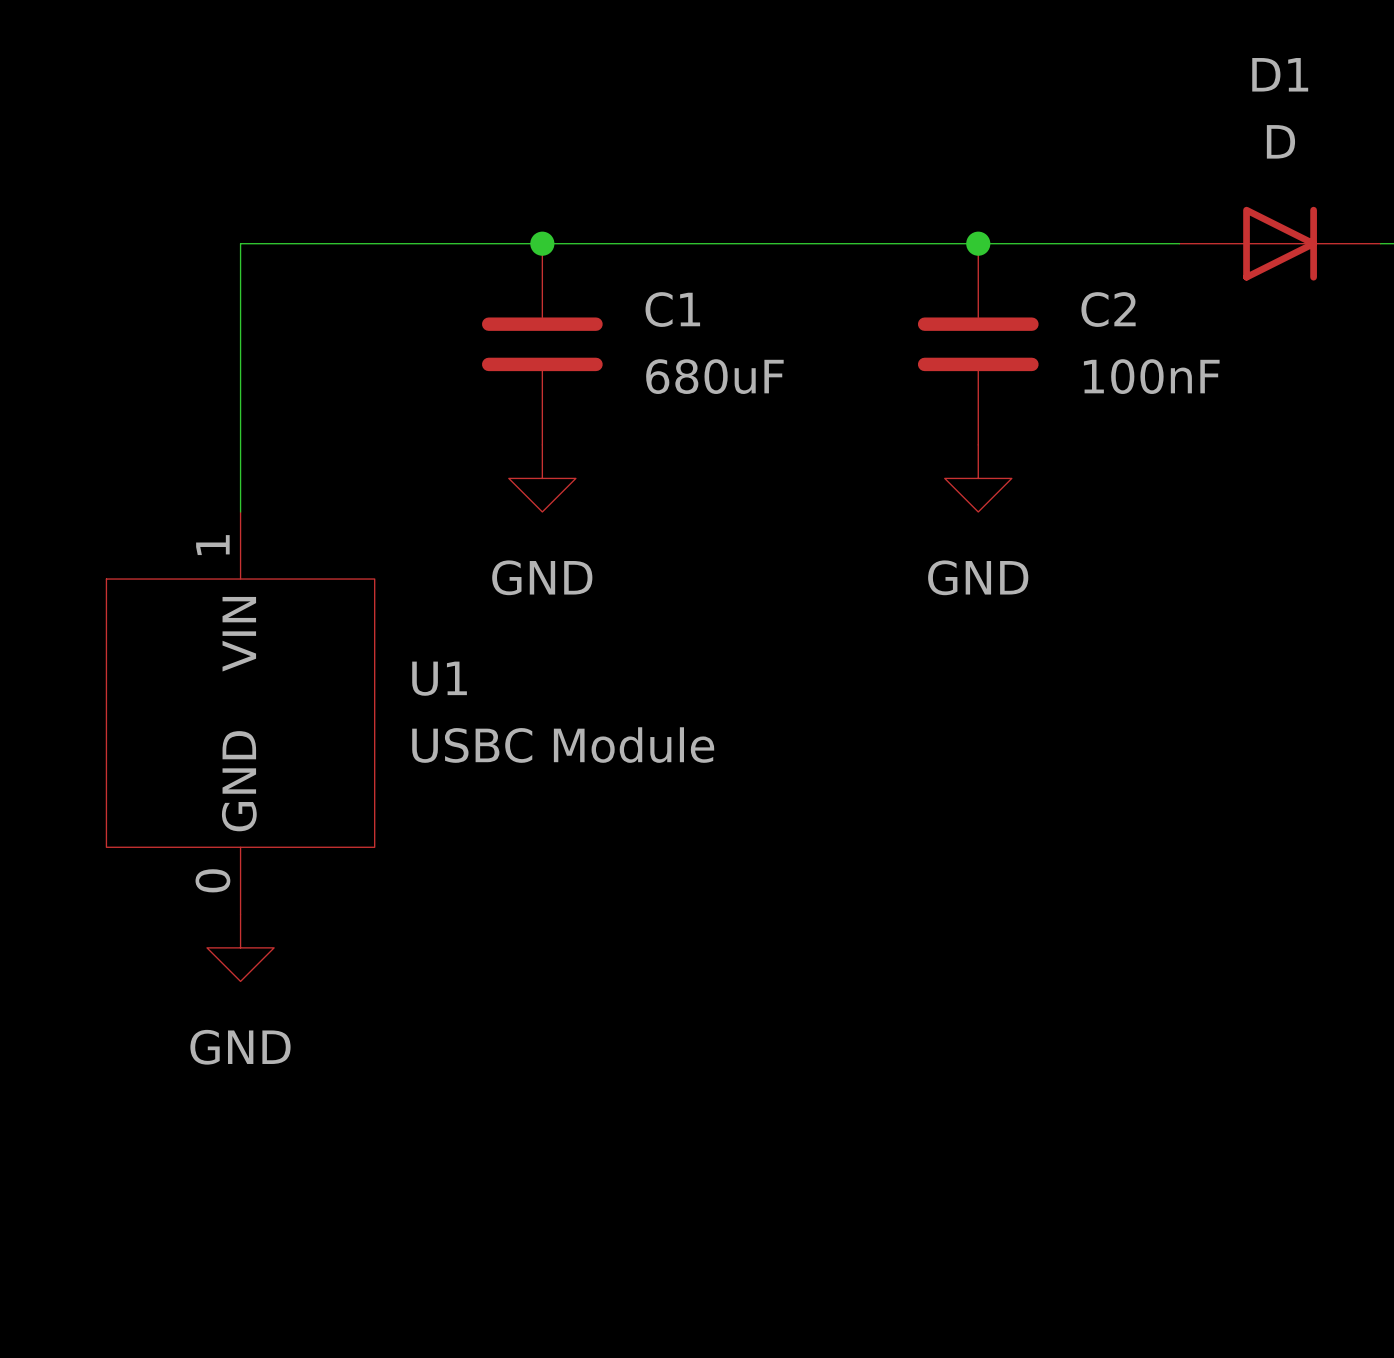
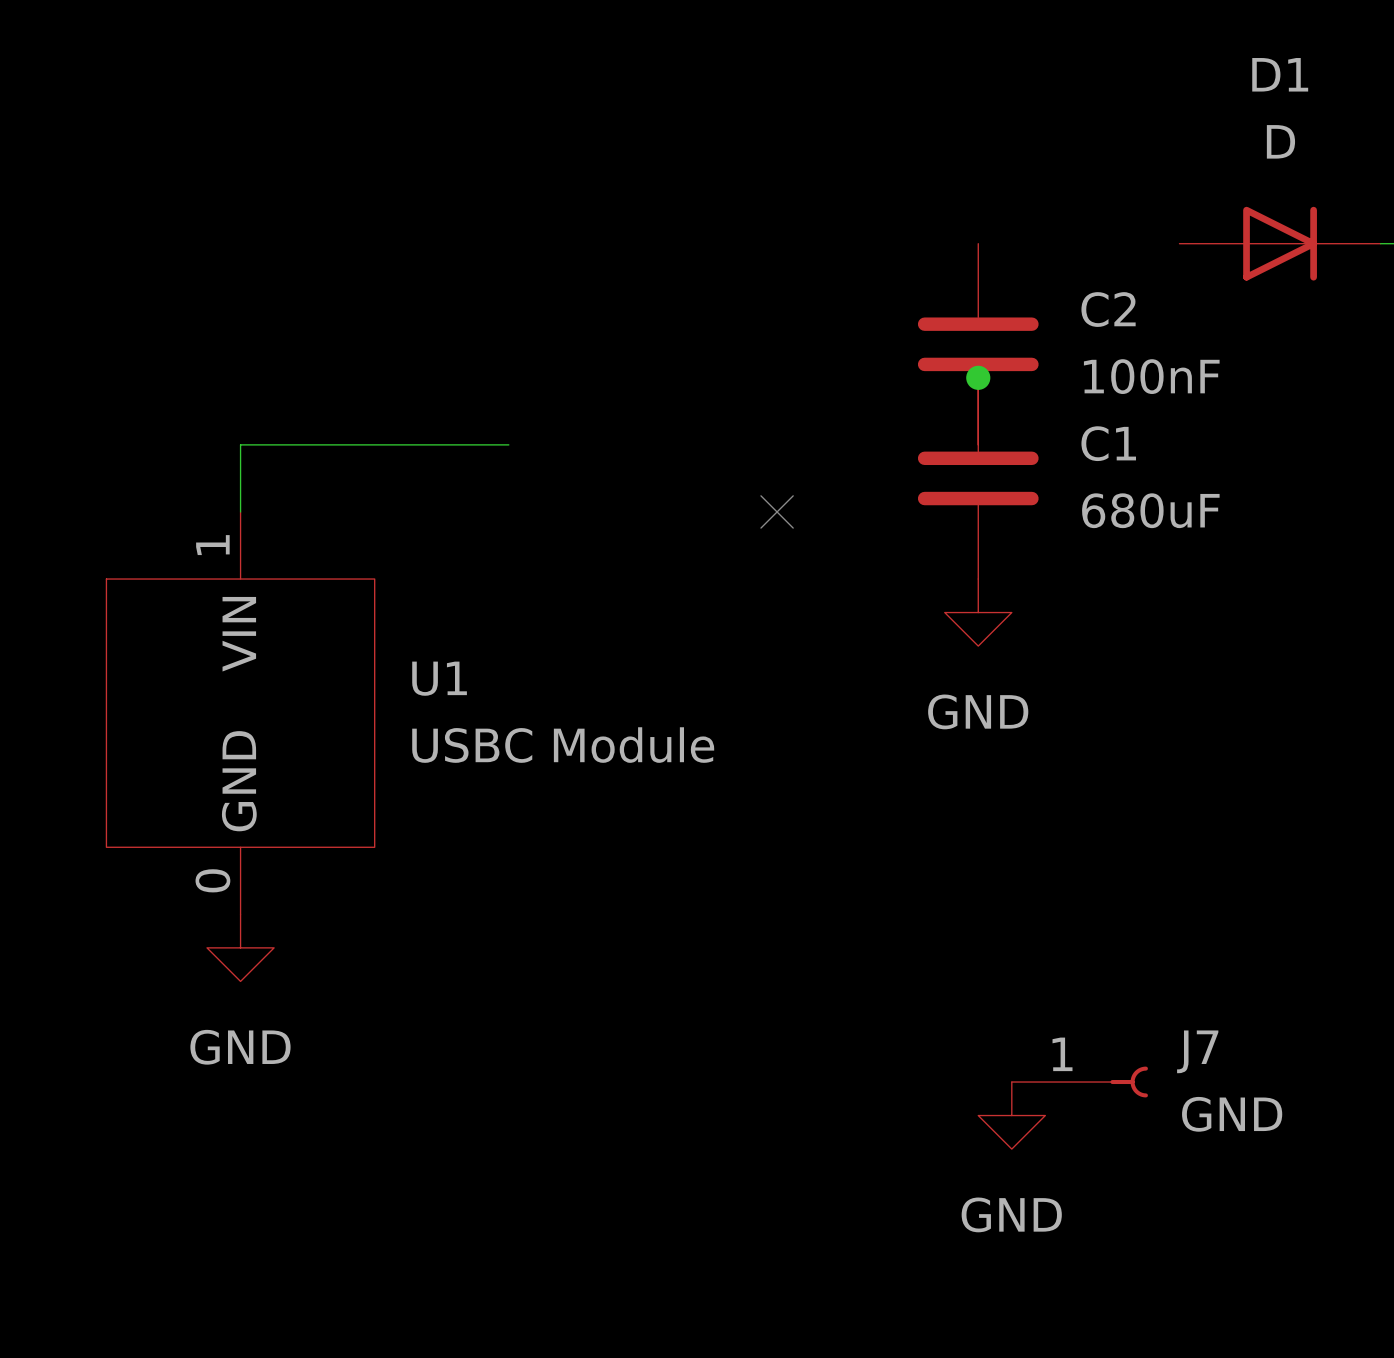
junction: (542, 243) -> none
junction position: (978, 243) -> (978, 377)
wire: (1179, 243) (240, 243) (240, 444) -> (508, 444) (240, 444)
C1 position: (542, 344) -> (978, 478)
power symbol: GND (542, 478) -> none
power symbol position: GND (978, 478) -> GND (978, 612)
no-connect mark: none -> (777, 511)
J7: none -> GND (1079, 1082)
power symbol: none -> GND (1011, 1115)

